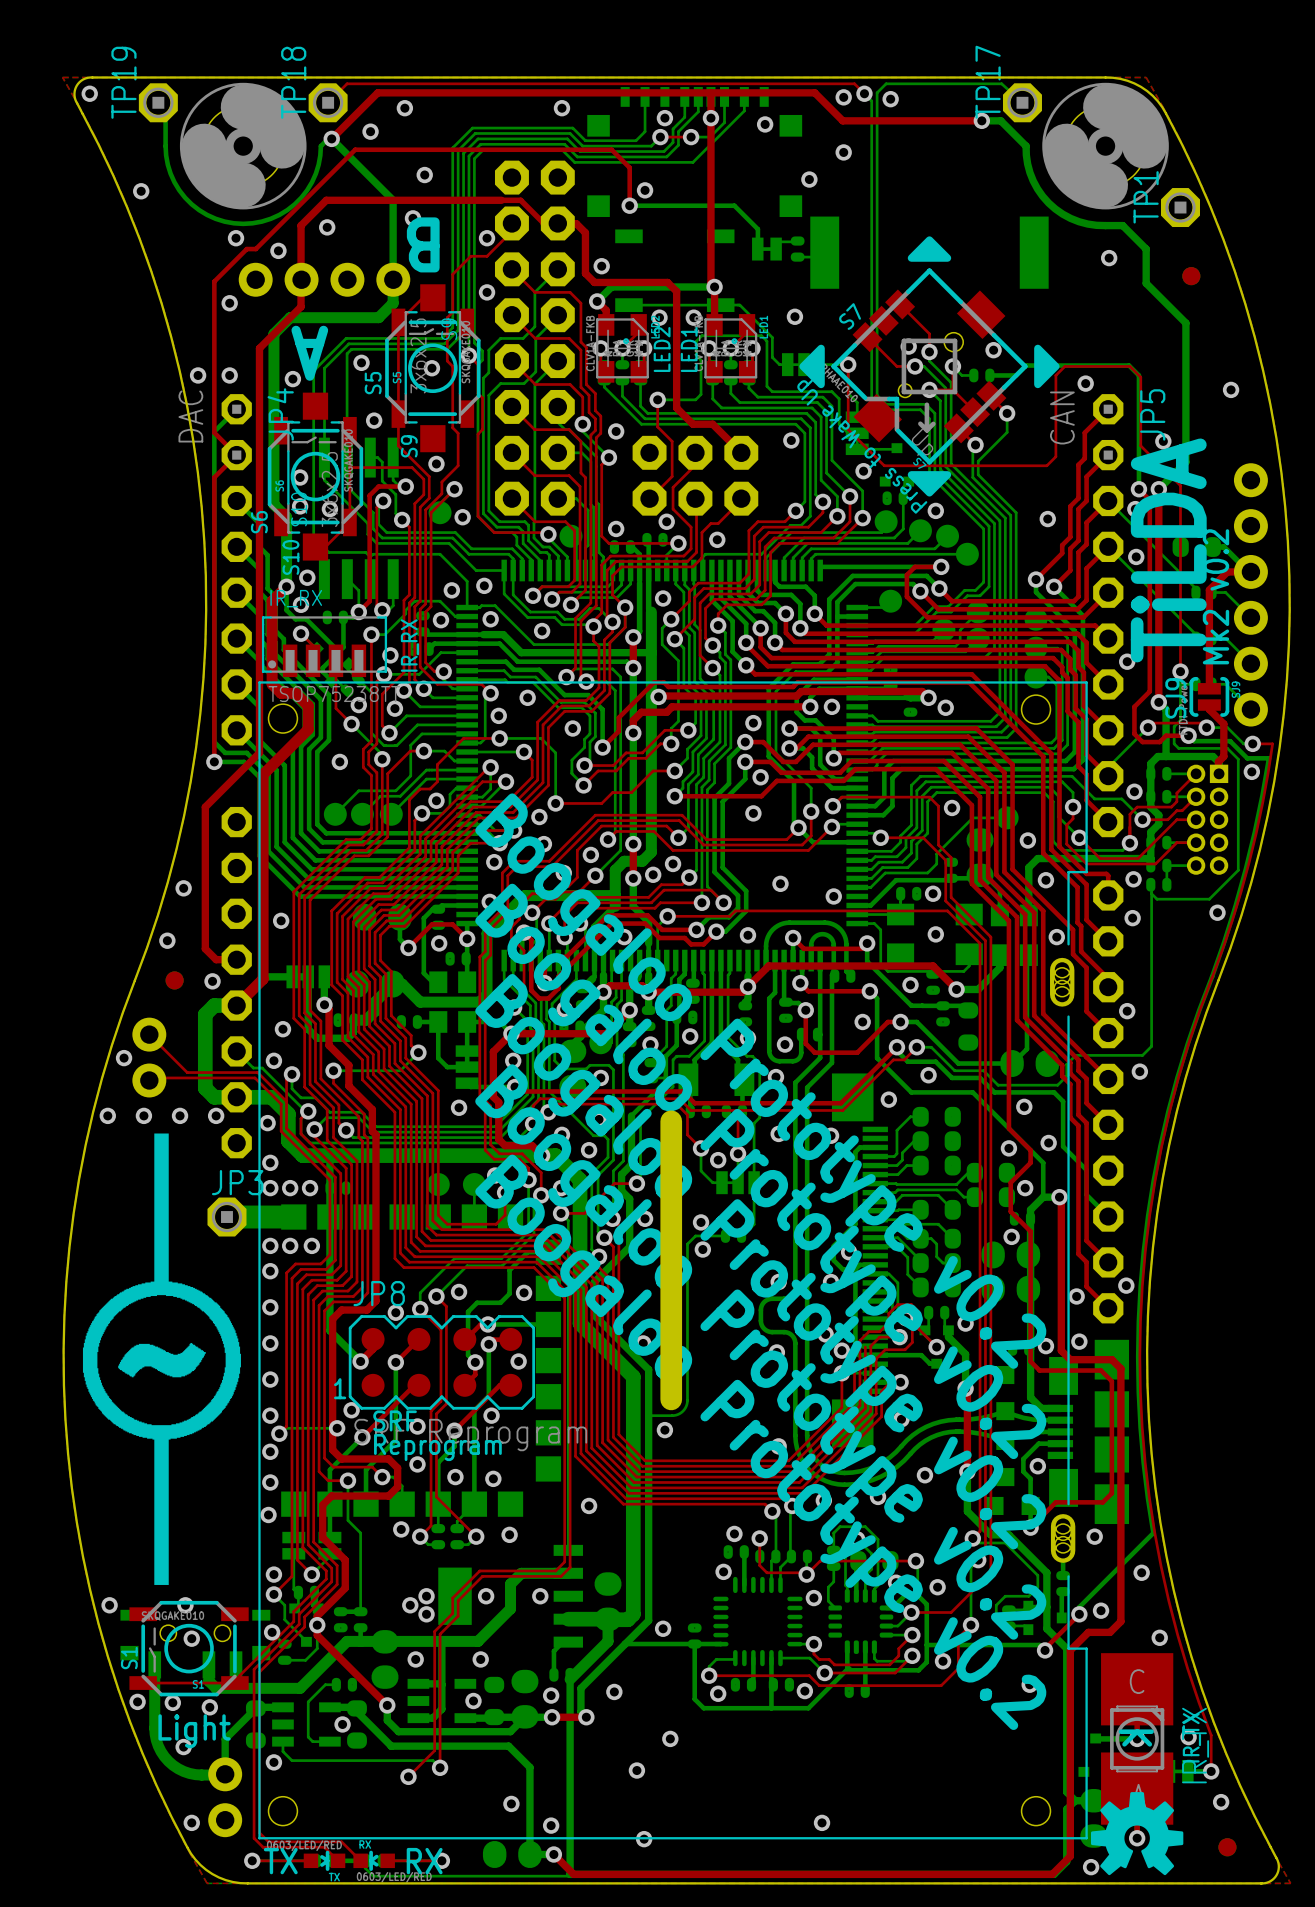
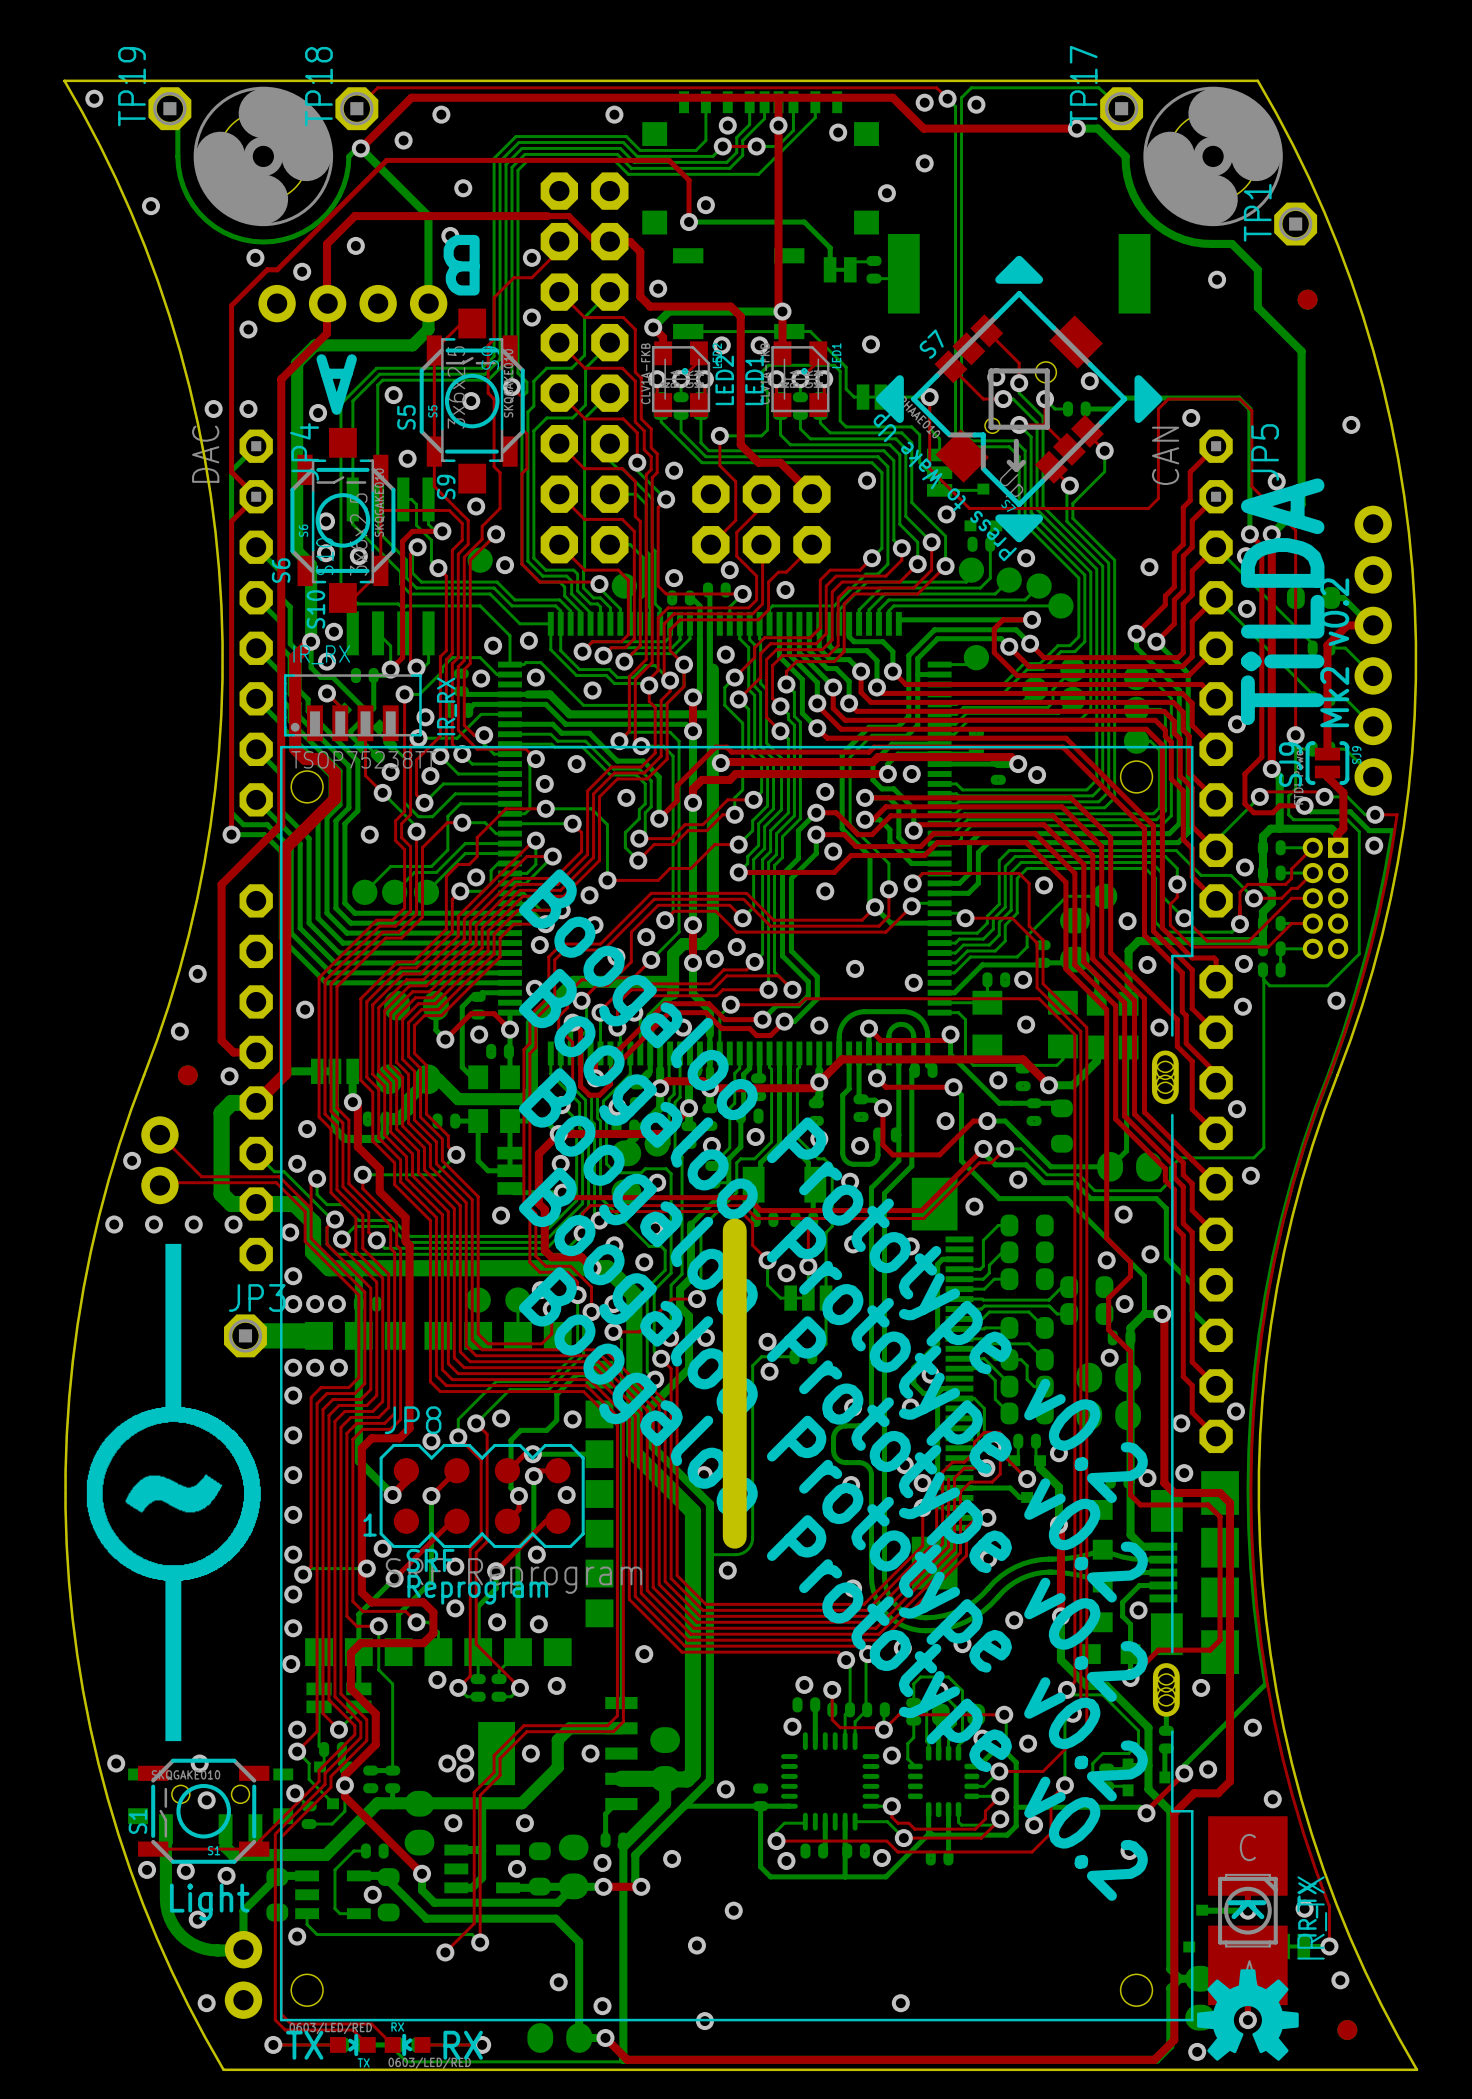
drawing shape: [62, 76, 1291, 1885] -> [63, 79, 1419, 2072]
board edge: none -> (223, 2069) (1416, 2069)

